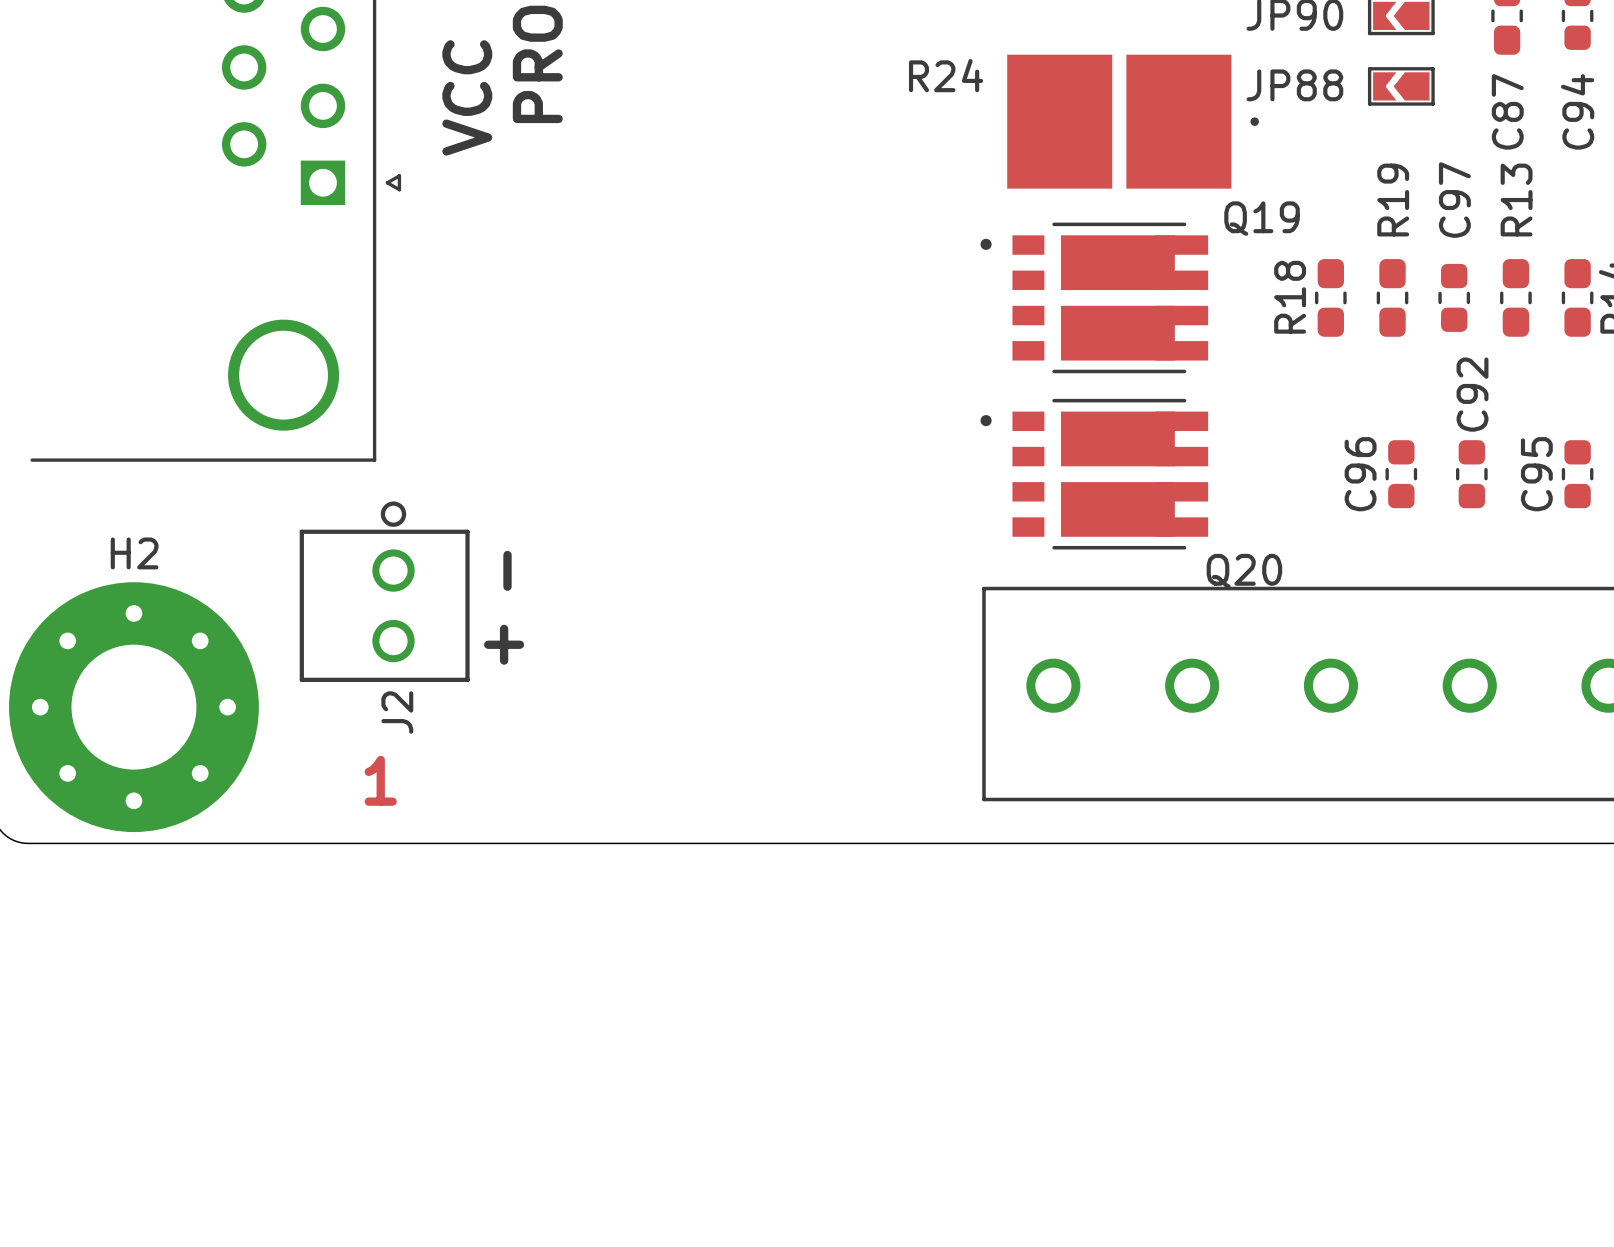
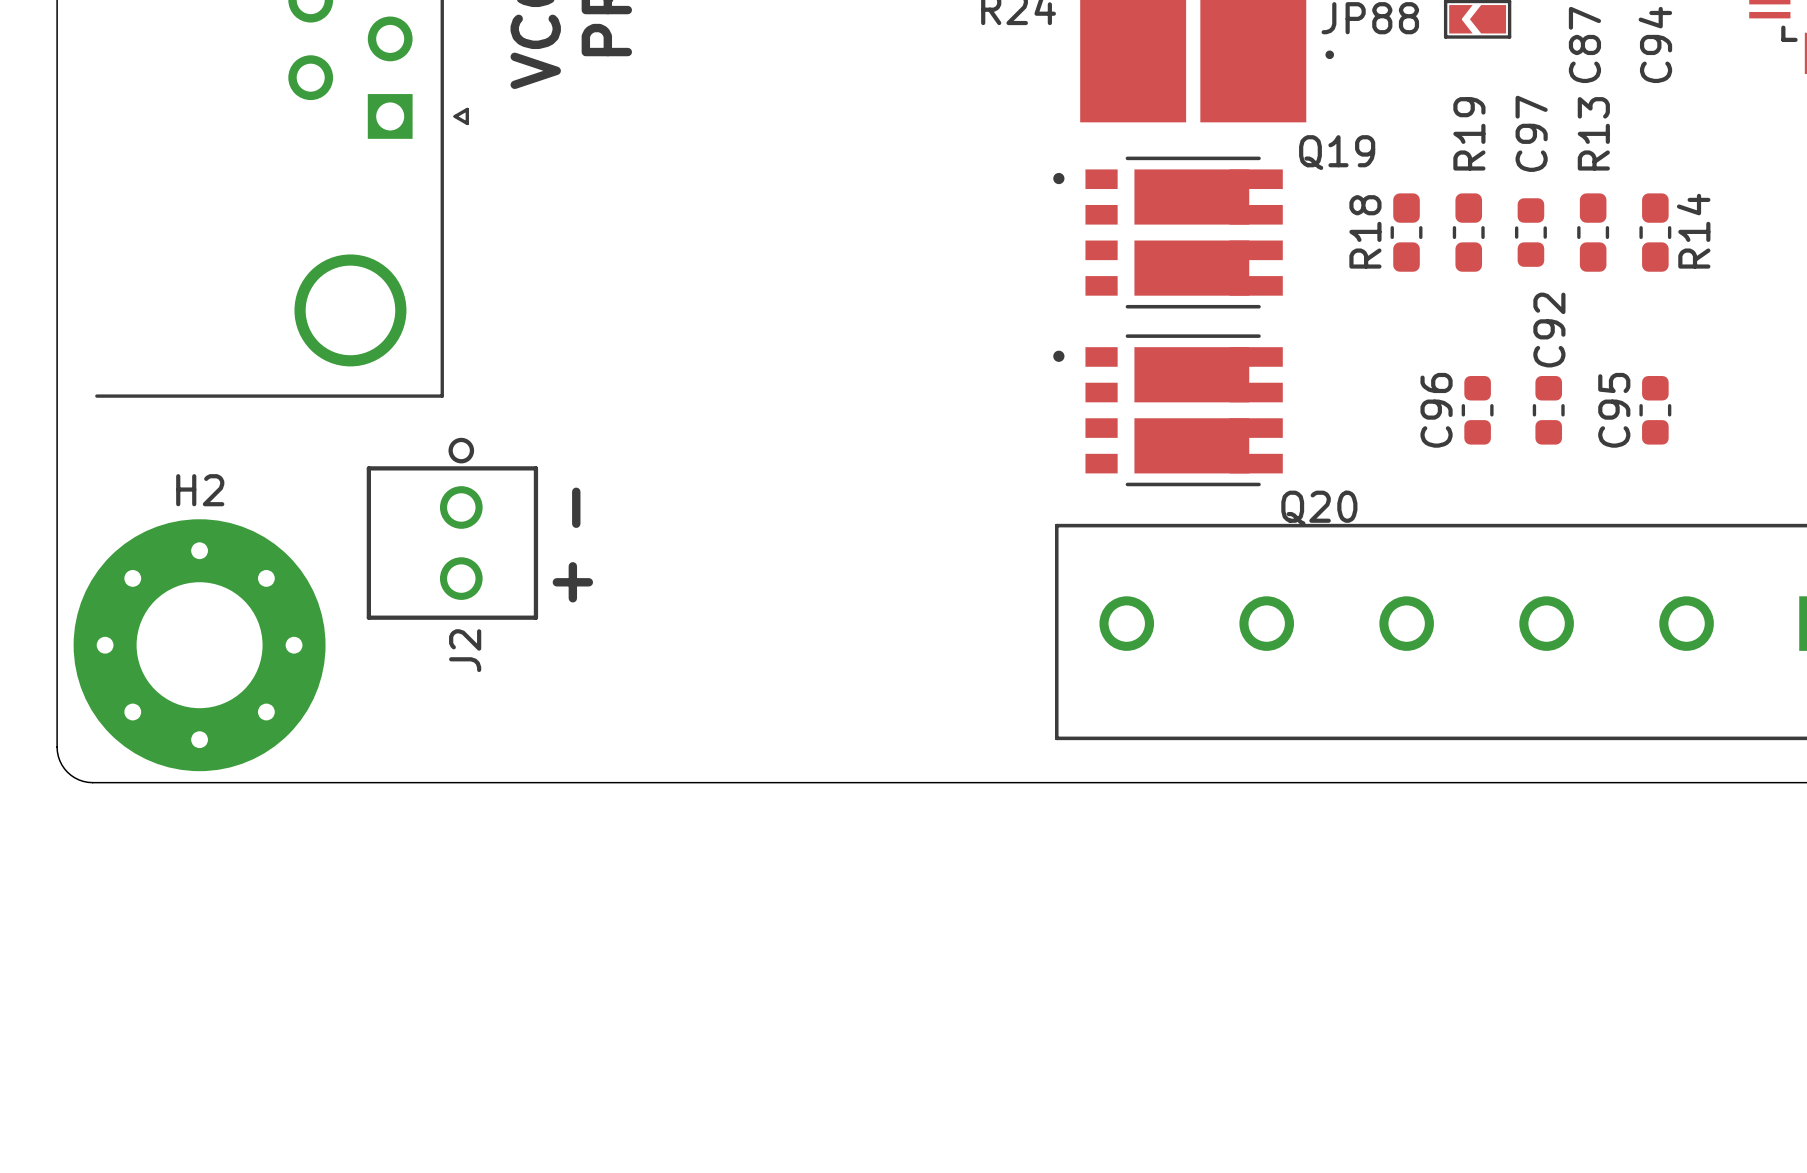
text: 1 (380, 780) -> none

